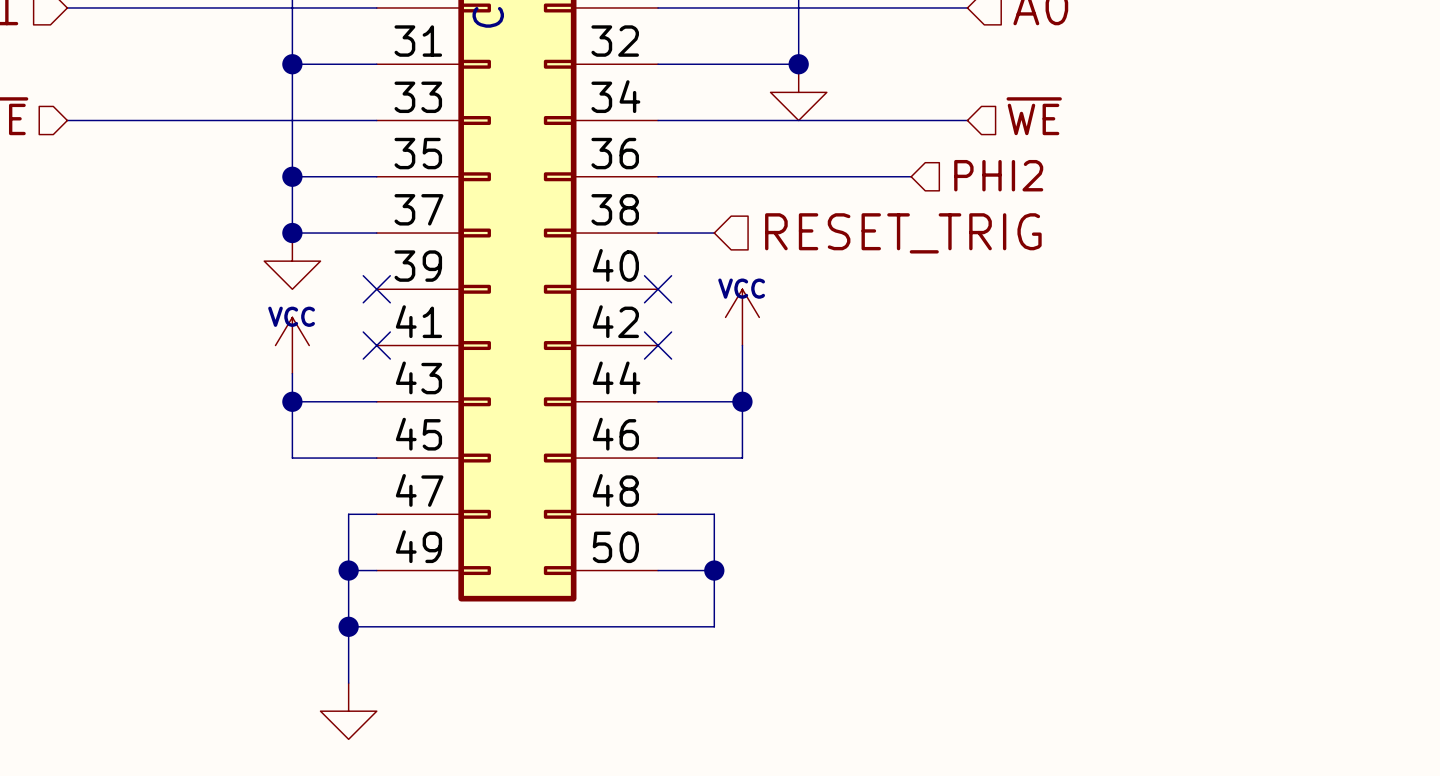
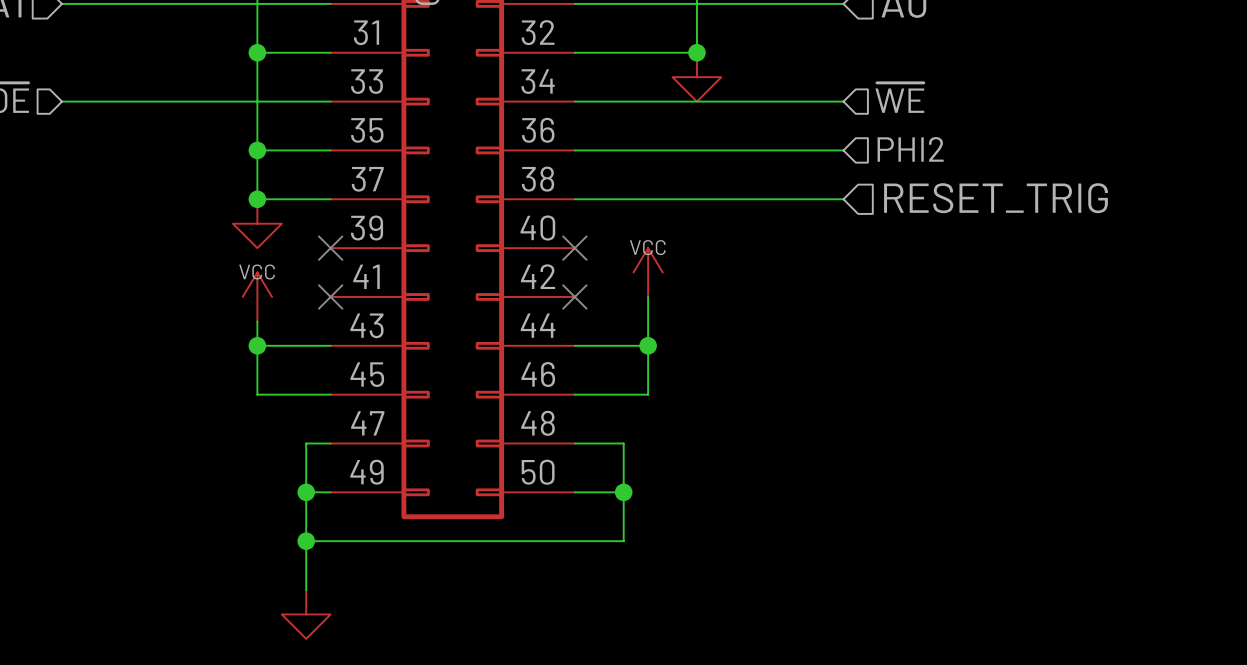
hierarchical label position: PHI2 (998, 175) -> PHI2 (910, 149)
wire: none -> (794, 150) (843, 150)
wire: none -> (623, 199) (843, 199)
hierarchical label position: RESET_TRIG (903, 233) -> RESET_TRIG (995, 198)

